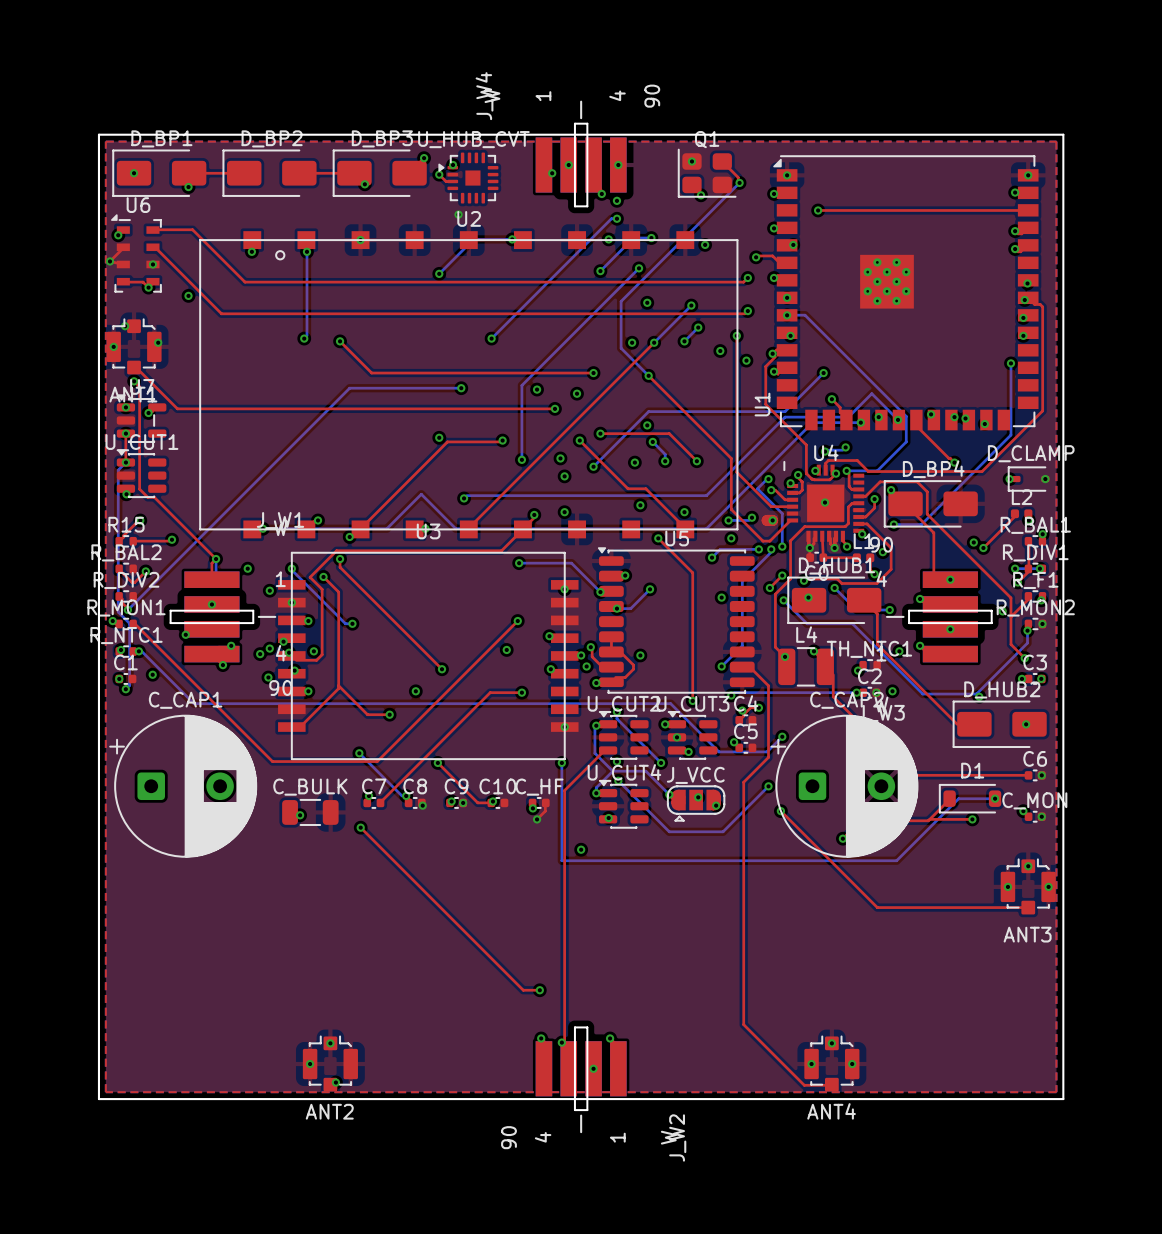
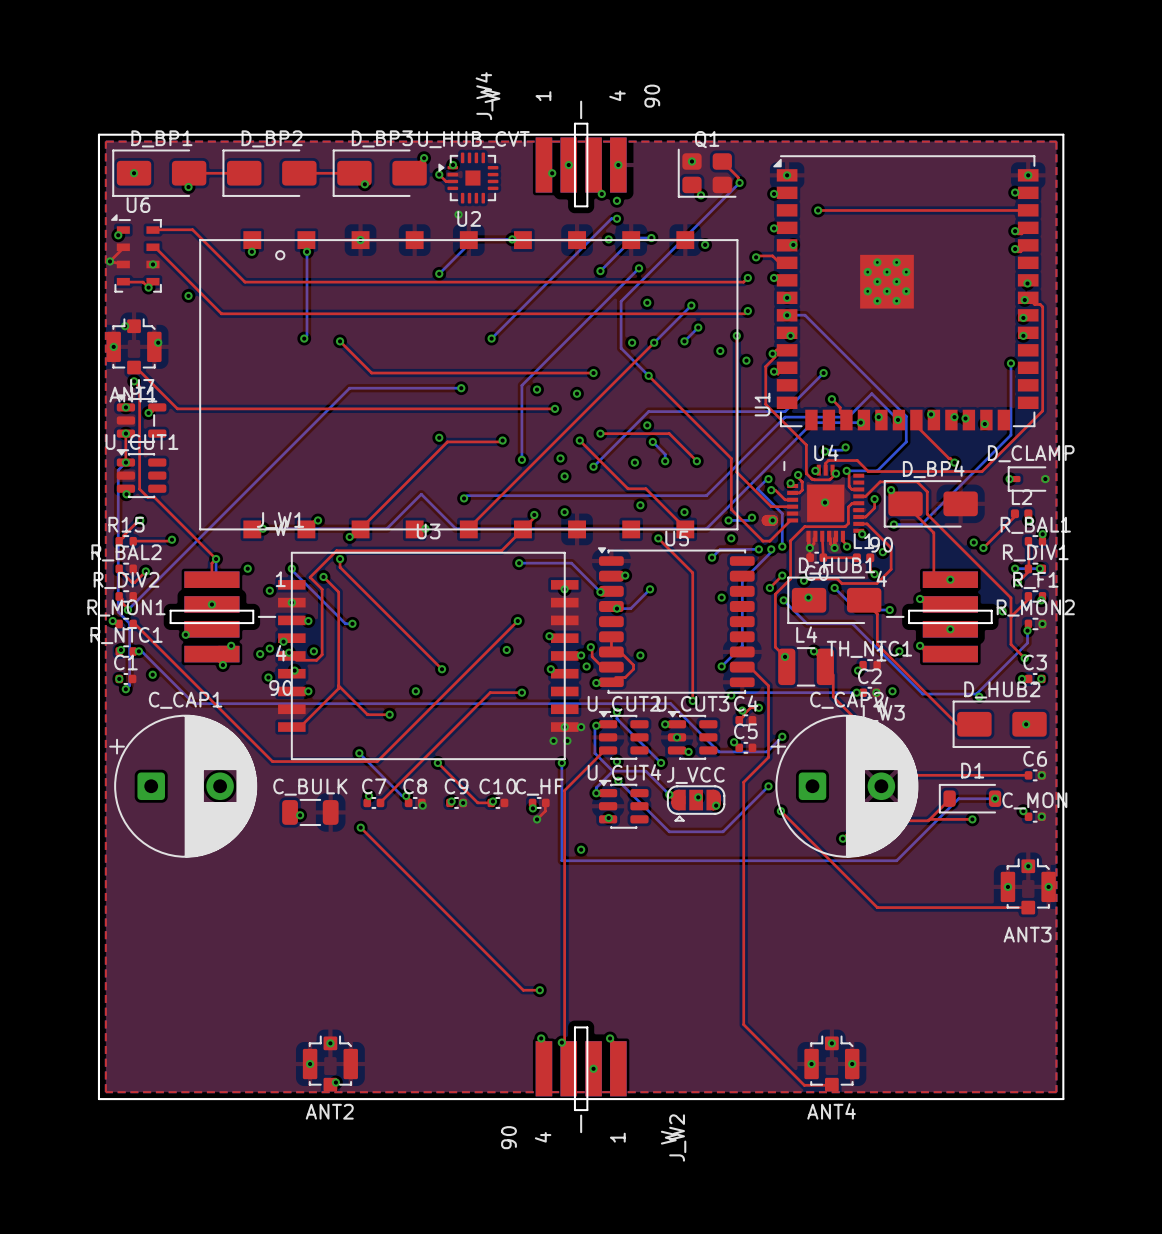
via: none -> (581, 727)
via: none -> (553, 740)
via: none -> (567, 740)

